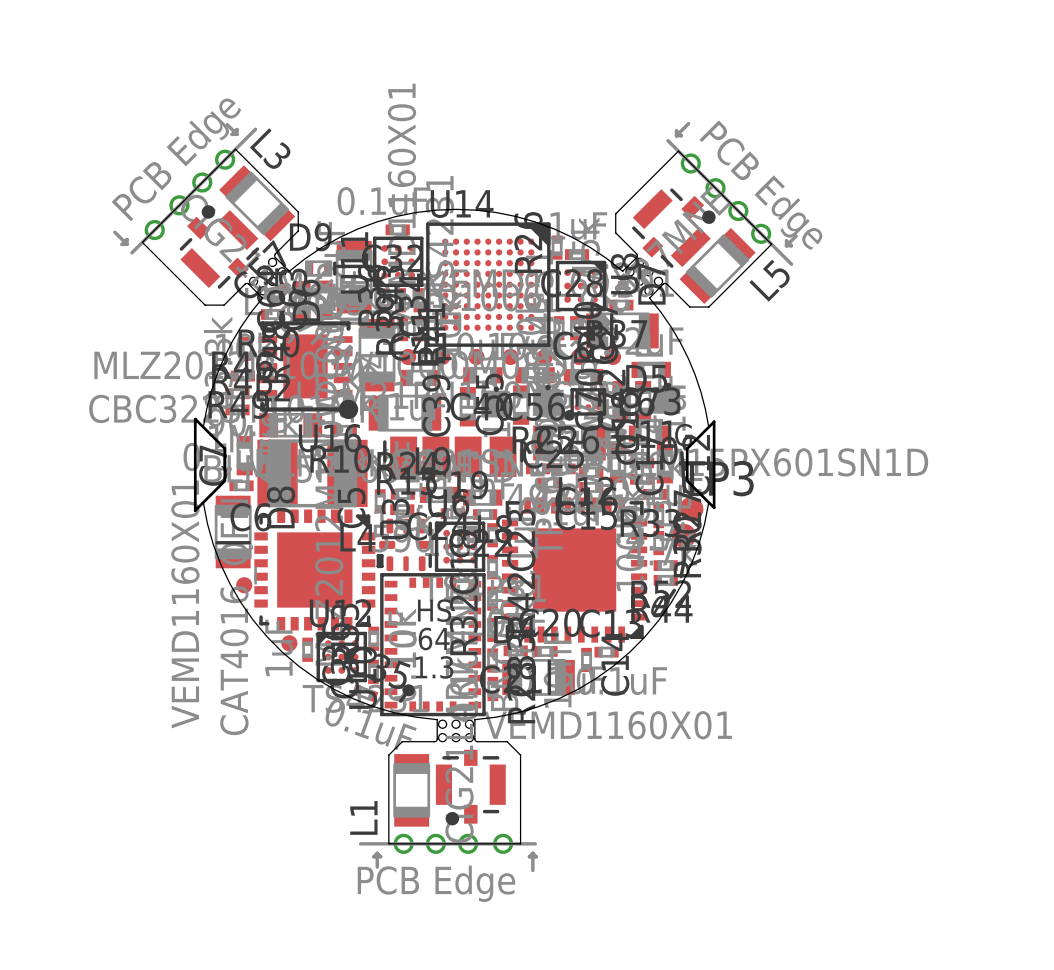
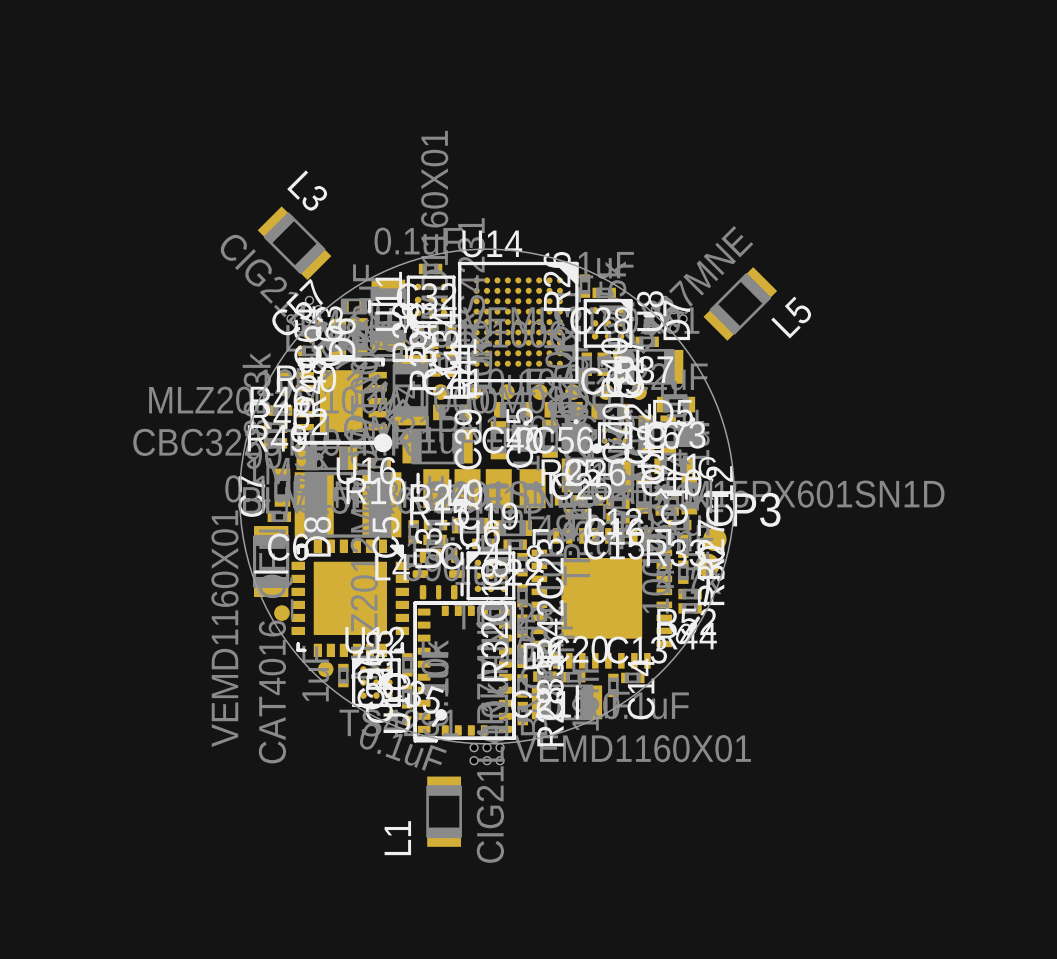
part: (185, 188) -> none
part: (732, 193) -> none
round board edge: none -> [239, 249, 735, 744]
part: (673, 228) -> none
D9 name: D9 (310, 237) -> none
part: (219, 247) -> none
board edge: (224, 448) (195, 419) (195, 510) (224, 480) -> none
board edge: (224, 448) (203, 427) (206, 409) (216, 375) (231, 342) (262, 298) (246, 283) (224, 305) (205, 305) (142, 242) (235, 149) (298, 211) (298, 230) (274, 255) (289, 271) (321, 247) (357, 229) (376, 222) (415, 212) (456, 209) (496, 212) (535, 222) (554, 229) (590, 247) (622, 271) (637, 255) (615, 232) (615, 213) (678, 151) (771, 244) (708, 307) (689, 307) (665, 283) (649, 298) (680, 342) (695, 375) (705, 409) (708, 427) (687, 448) -> none
board edge: (687, 448) (714, 421) (714, 507) (687, 480) -> none
line: (681, 452) (684, 491) -> none
board edge: (224, 480) (203, 502) (207, 523) (213, 544) (230, 583) (240, 602) (267, 636) (298, 666) (334, 689) (374, 706) (415, 717) (437, 719) (436, 741) (402, 741) (388, 755) (388, 843) (520, 843) (520, 755) (507, 741) (475, 741) (474, 719) (496, 717) (538, 706) (577, 689) (613, 666) (645, 636) (671, 602) (682, 583) (698, 544) (704, 523) (708, 502) (687, 480) -> none
part footprint: [502, 497, 648, 643] -> [531, 528, 673, 669]
part footprint: [376, 518, 433, 572] -> [412, 548, 465, 600]
part: none -> (271, 561)
part: none -> (350, 598)
text: HS (434, 610) -> none
text: 64 (434, 639) -> none
part: none -> (464, 671)
text: 1.3 (434, 667) -> none
part: (470, 787) -> none
part: (448, 852) -> none

